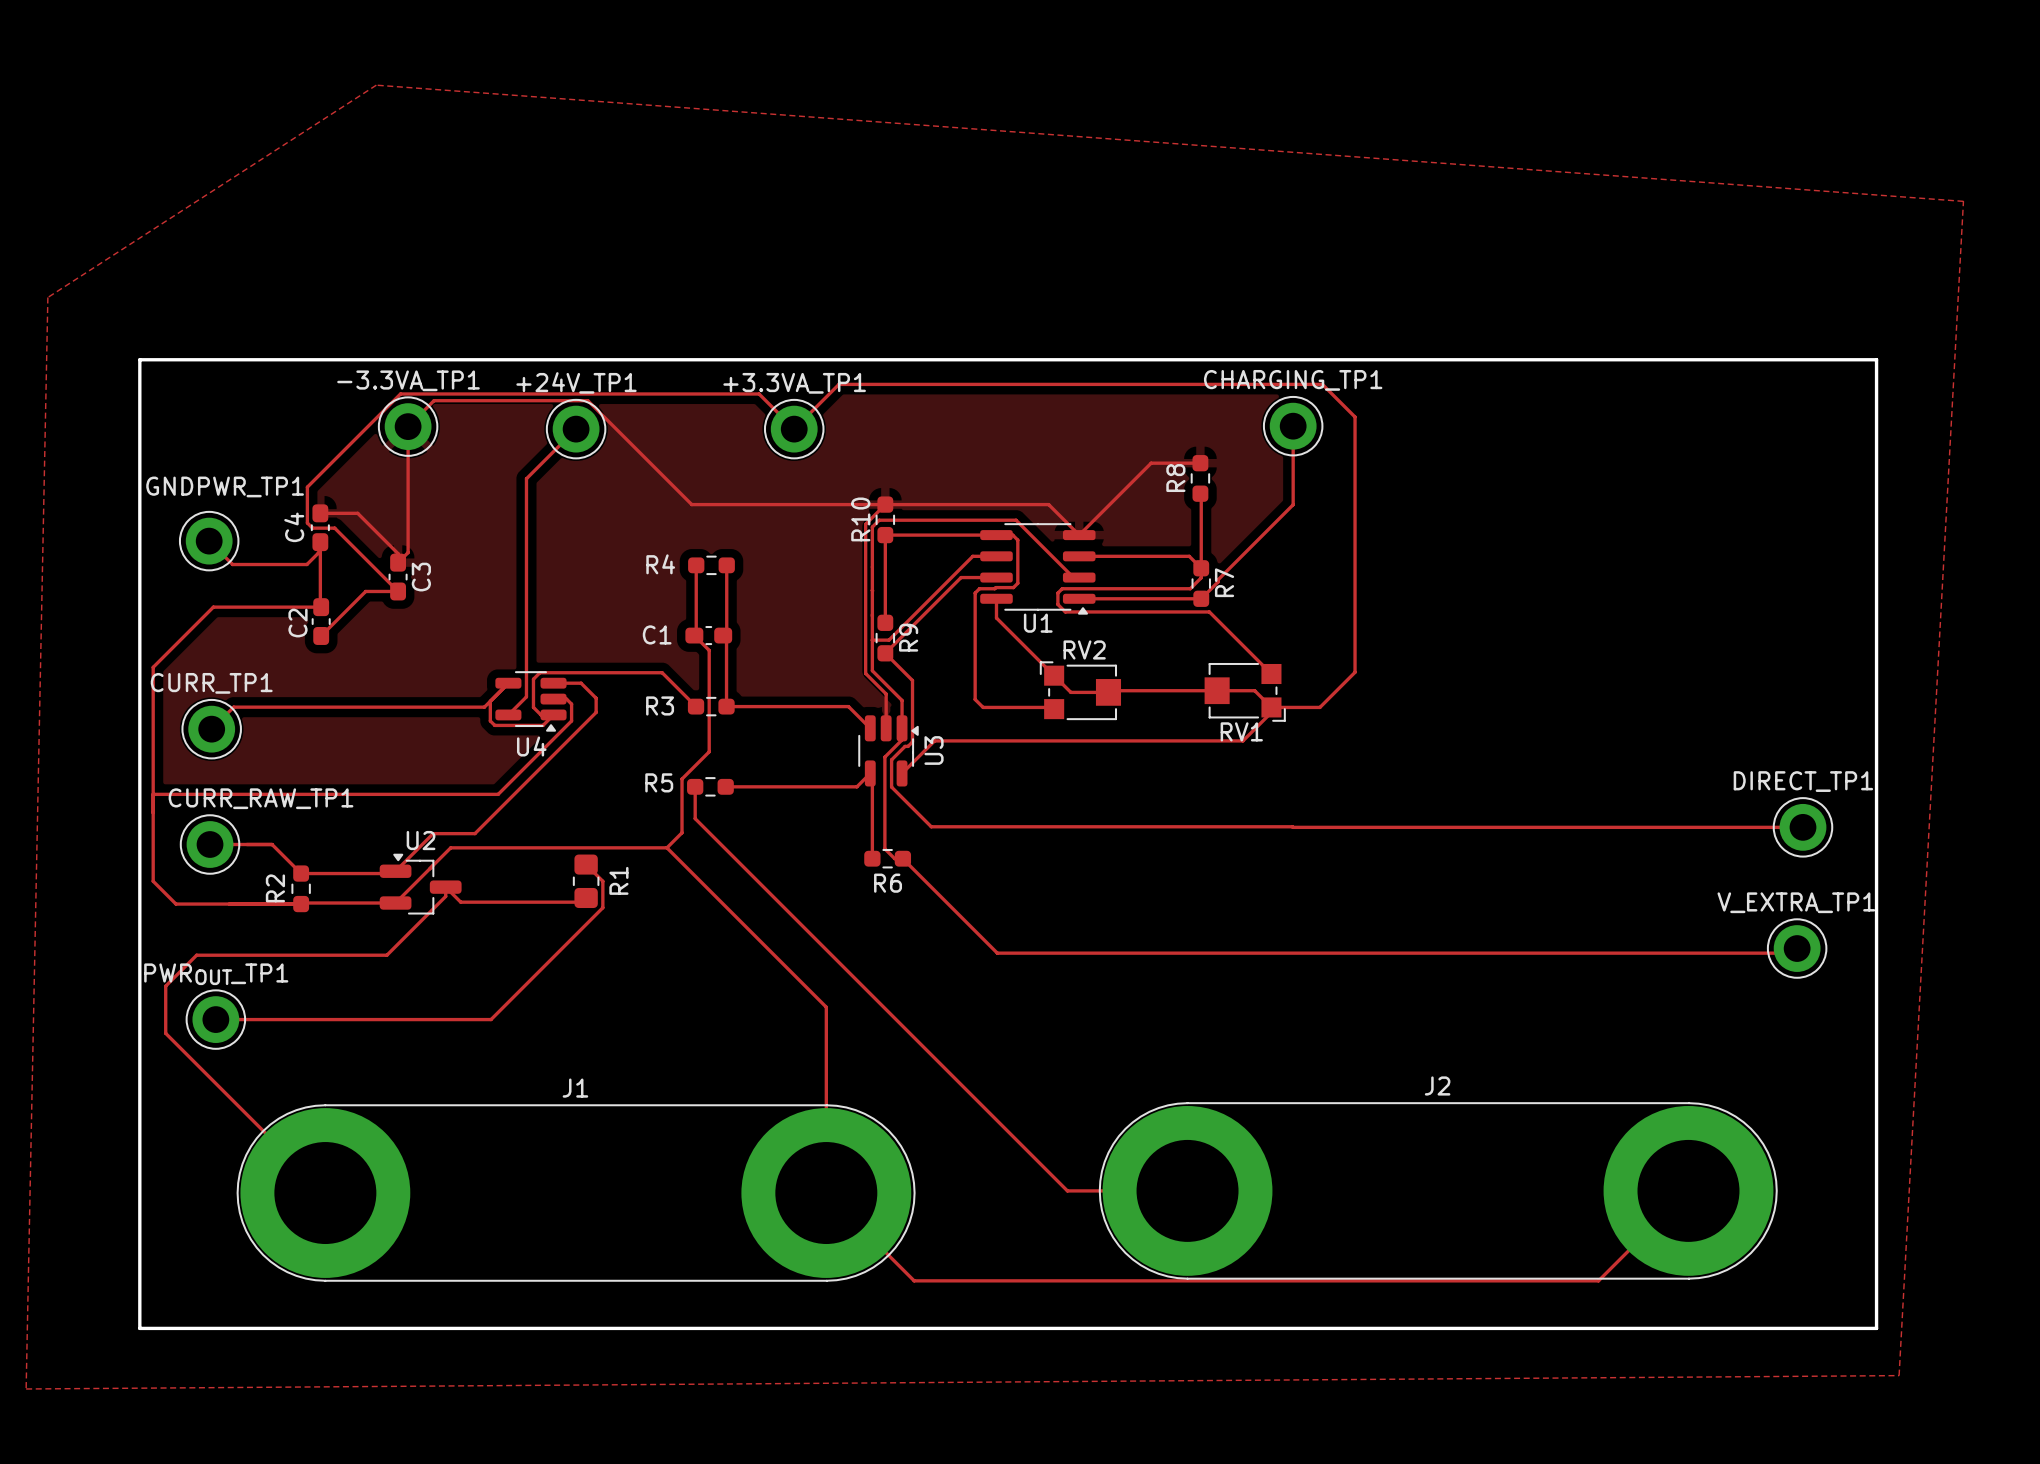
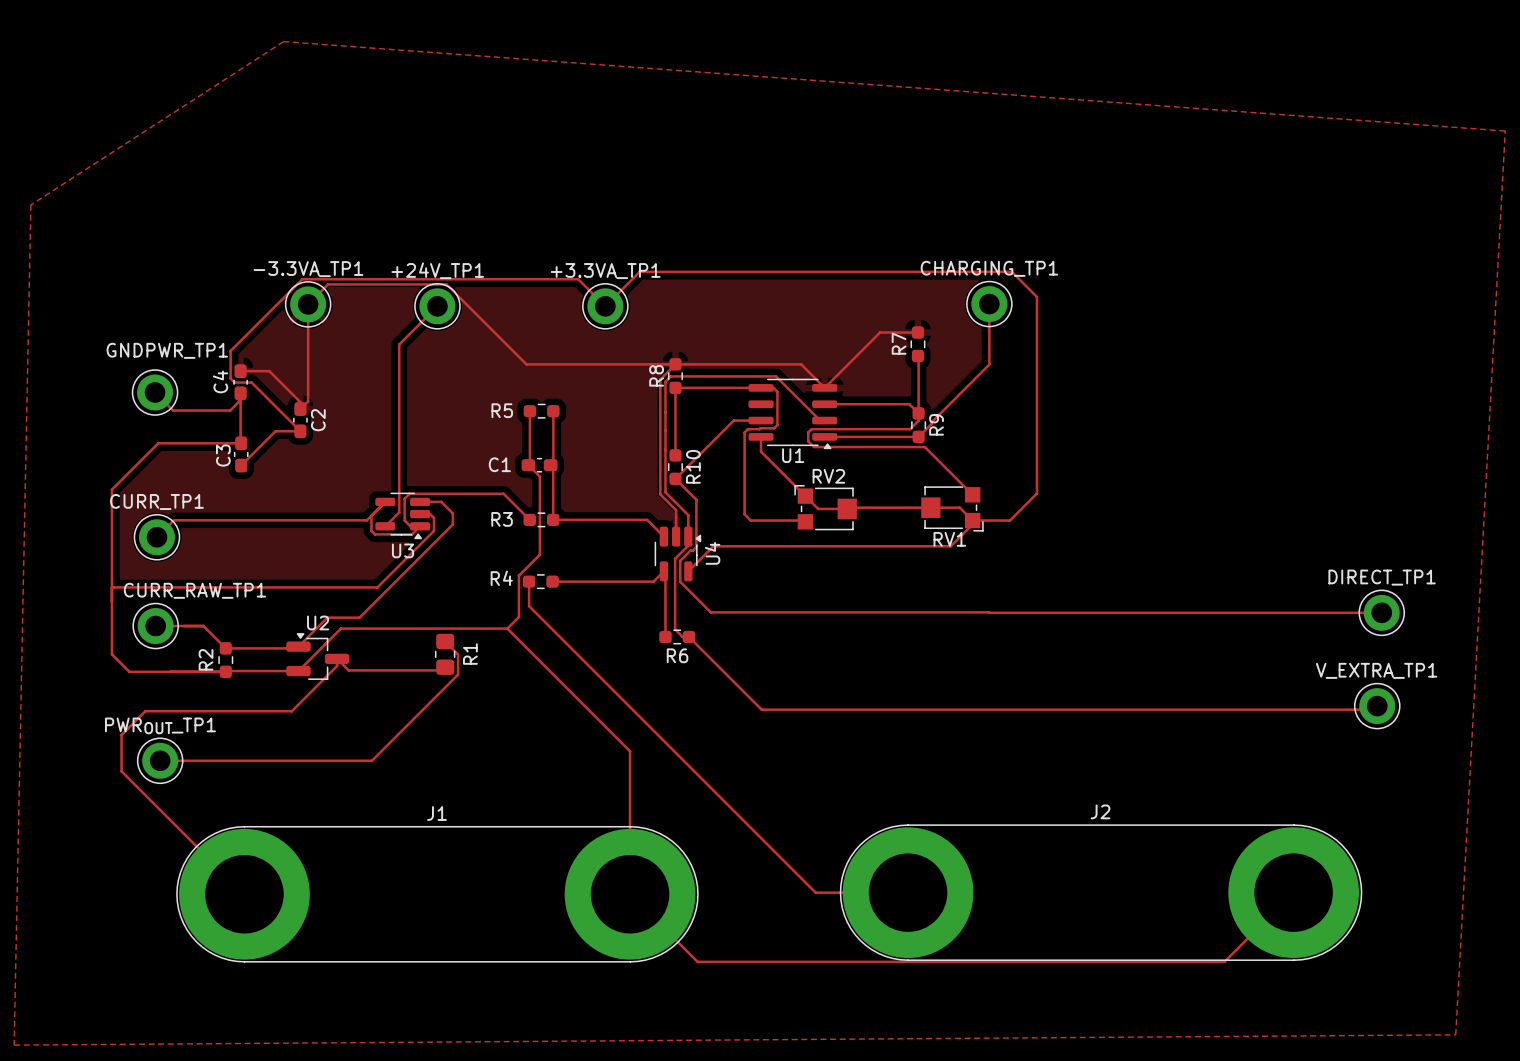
board edge: (139, 359) (1876, 359) (1876, 1328) (139, 1328) (139, 359) -> none
R8 name: R8 (1175, 478) -> R7 (899, 343)
R10 name: R10 (860, 519) -> R8 (656, 375)
track: (996, 556) (972, 556) (888, 640) (872, 640) -> none
R4 name: R4 (660, 564) -> R5 (502, 410)
C3 name: C3 (421, 577) -> C2 (318, 420)
R7 name: R7 (1224, 582) -> R9 (936, 424)
C2 name: C2 (297, 623) -> C3 (223, 455)
R9 name: R9 (908, 637) -> R10 (693, 466)
U4 name: U4 (531, 746) -> U3 (403, 550)
U3 name: U3 (934, 750) -> U4 (712, 553)
R5 name: R5 (659, 782) -> R4 (501, 578)

